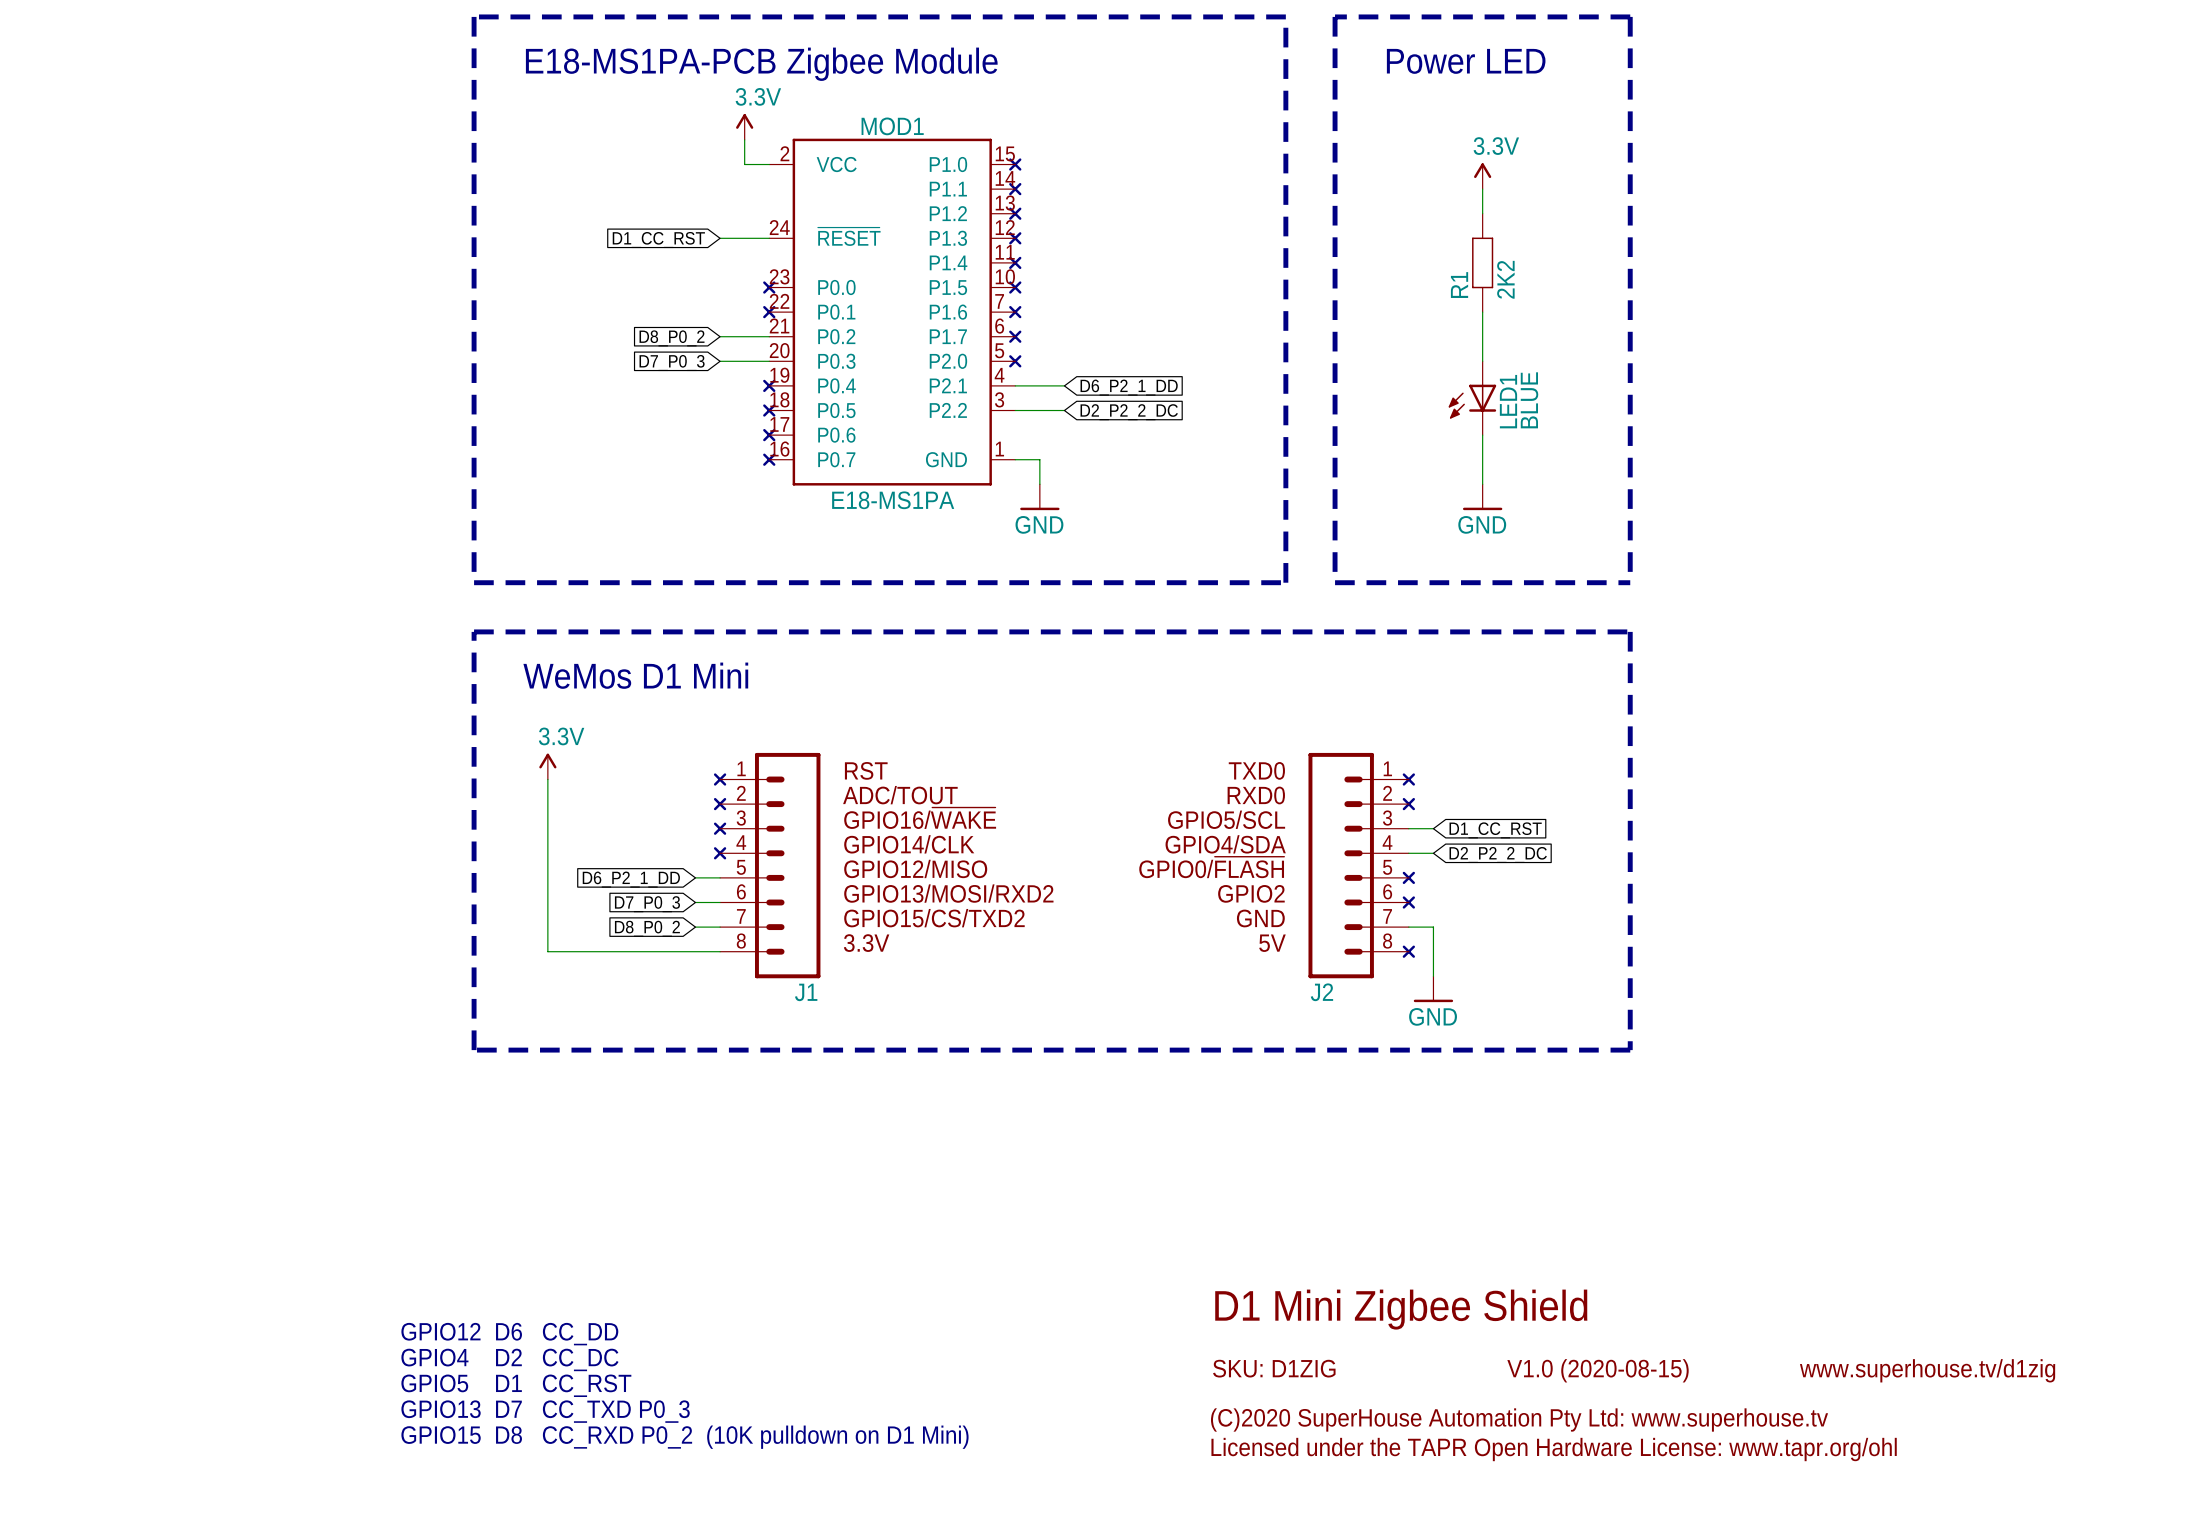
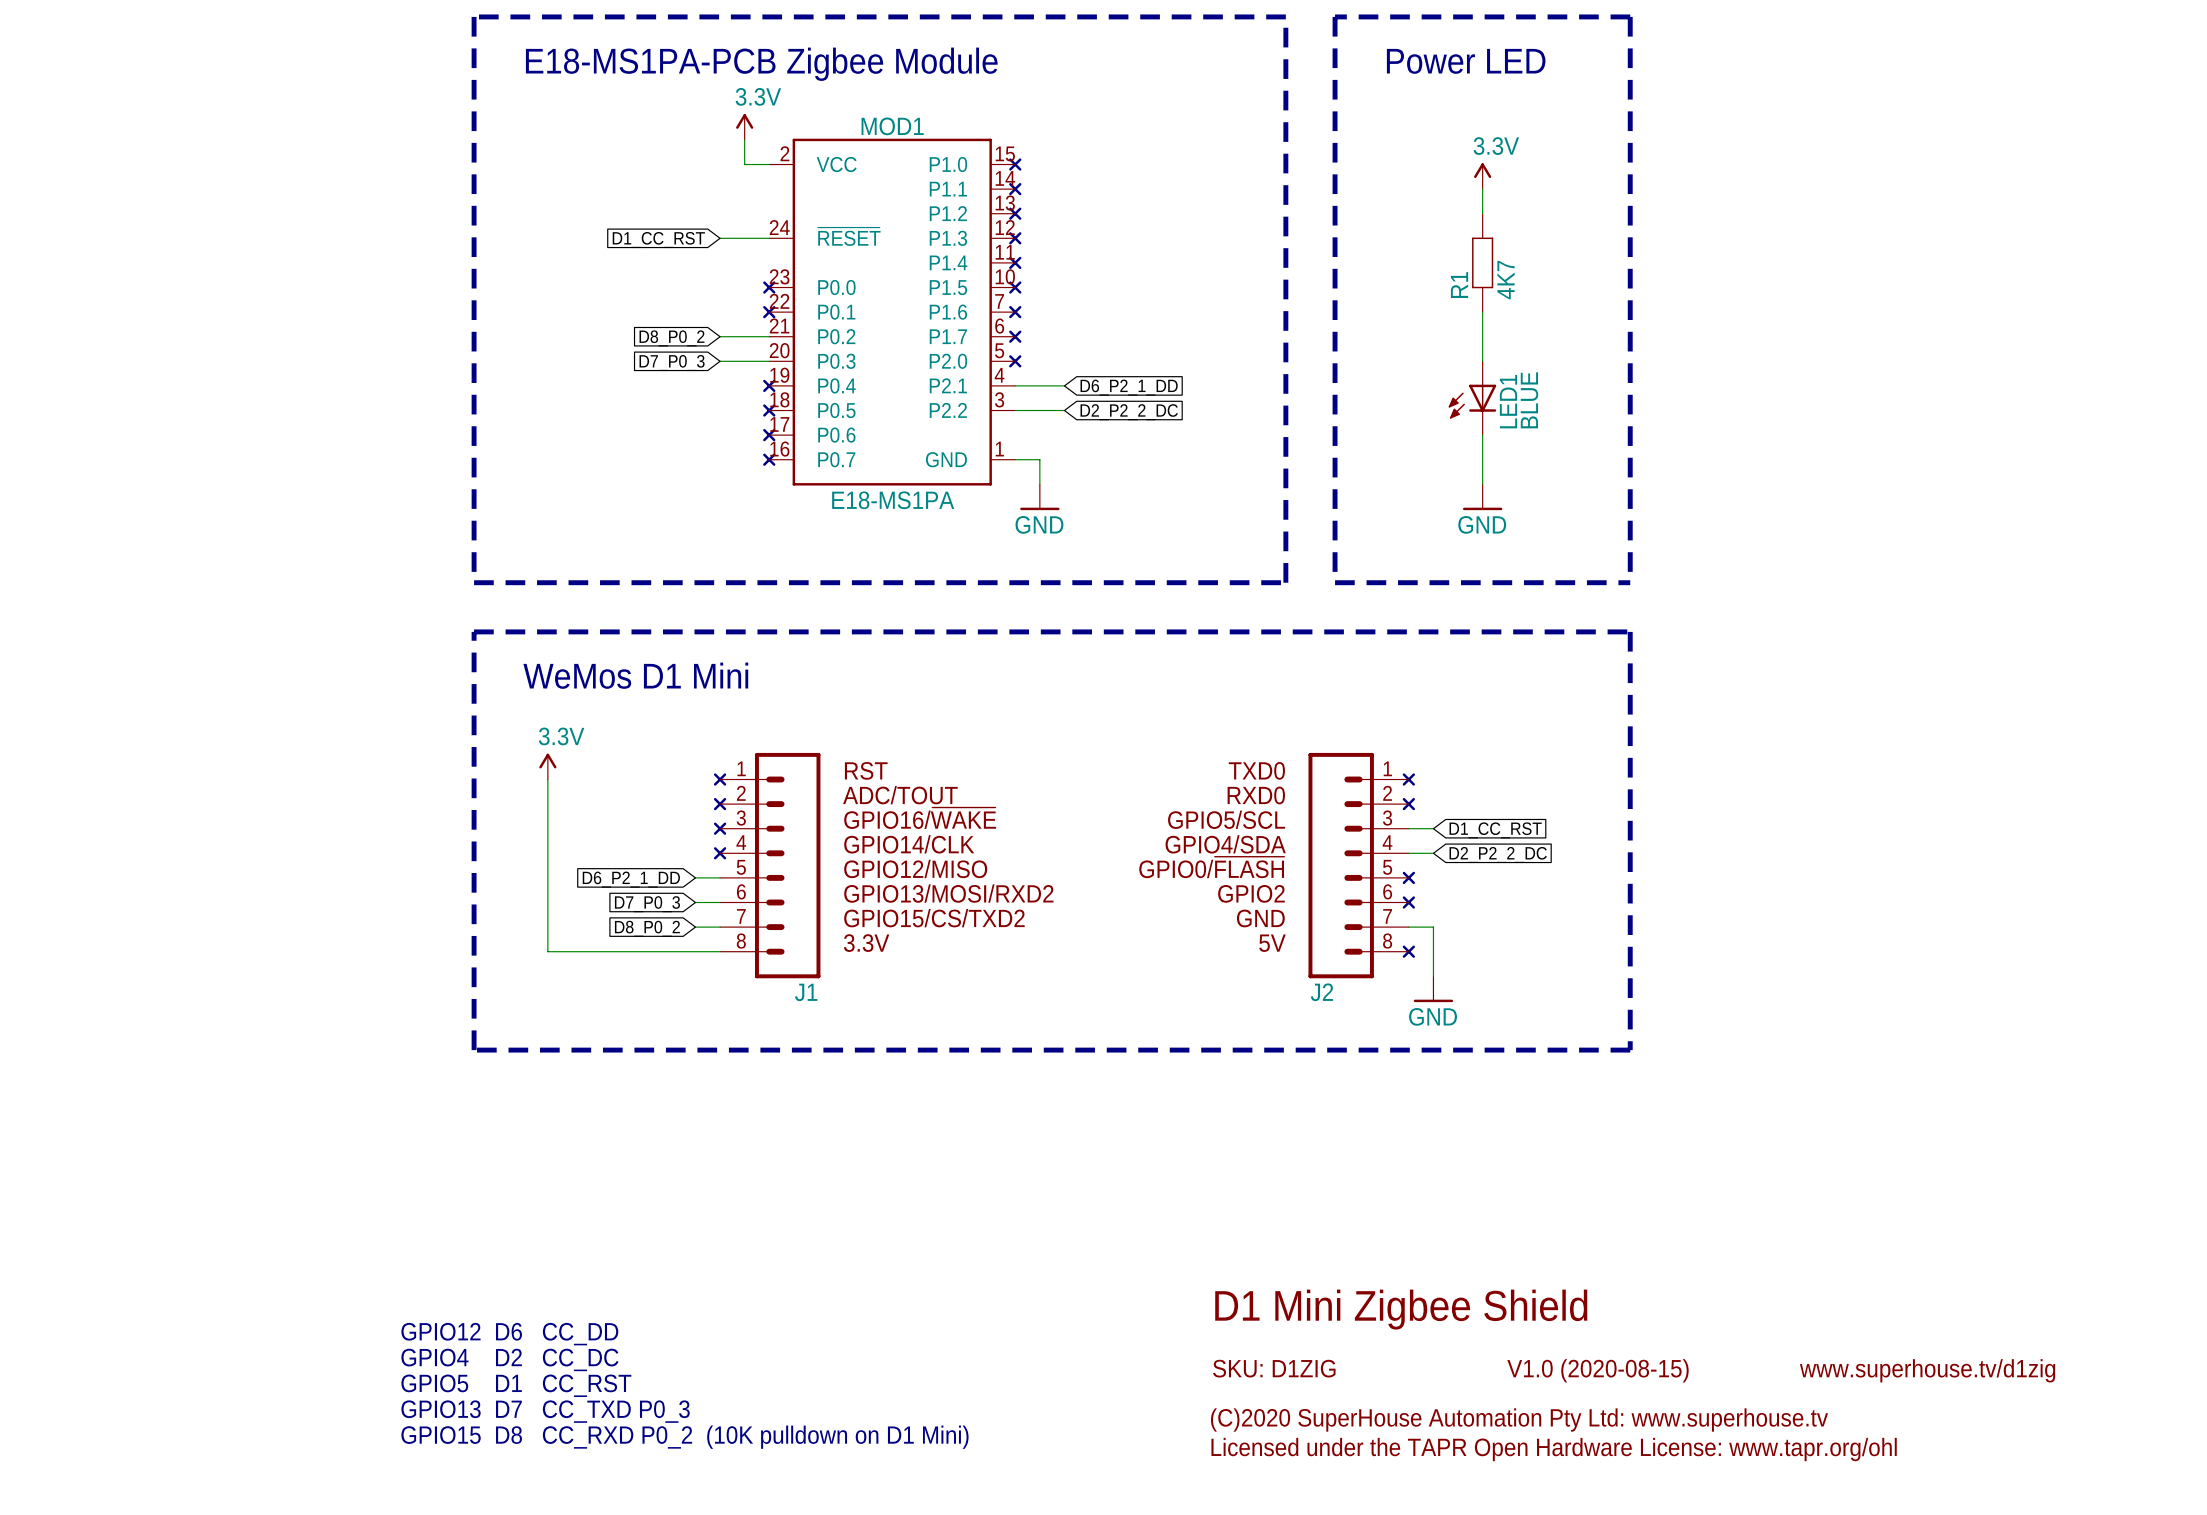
R1 value: 2K2 (1505, 279) -> 4K7 (1506, 280)

